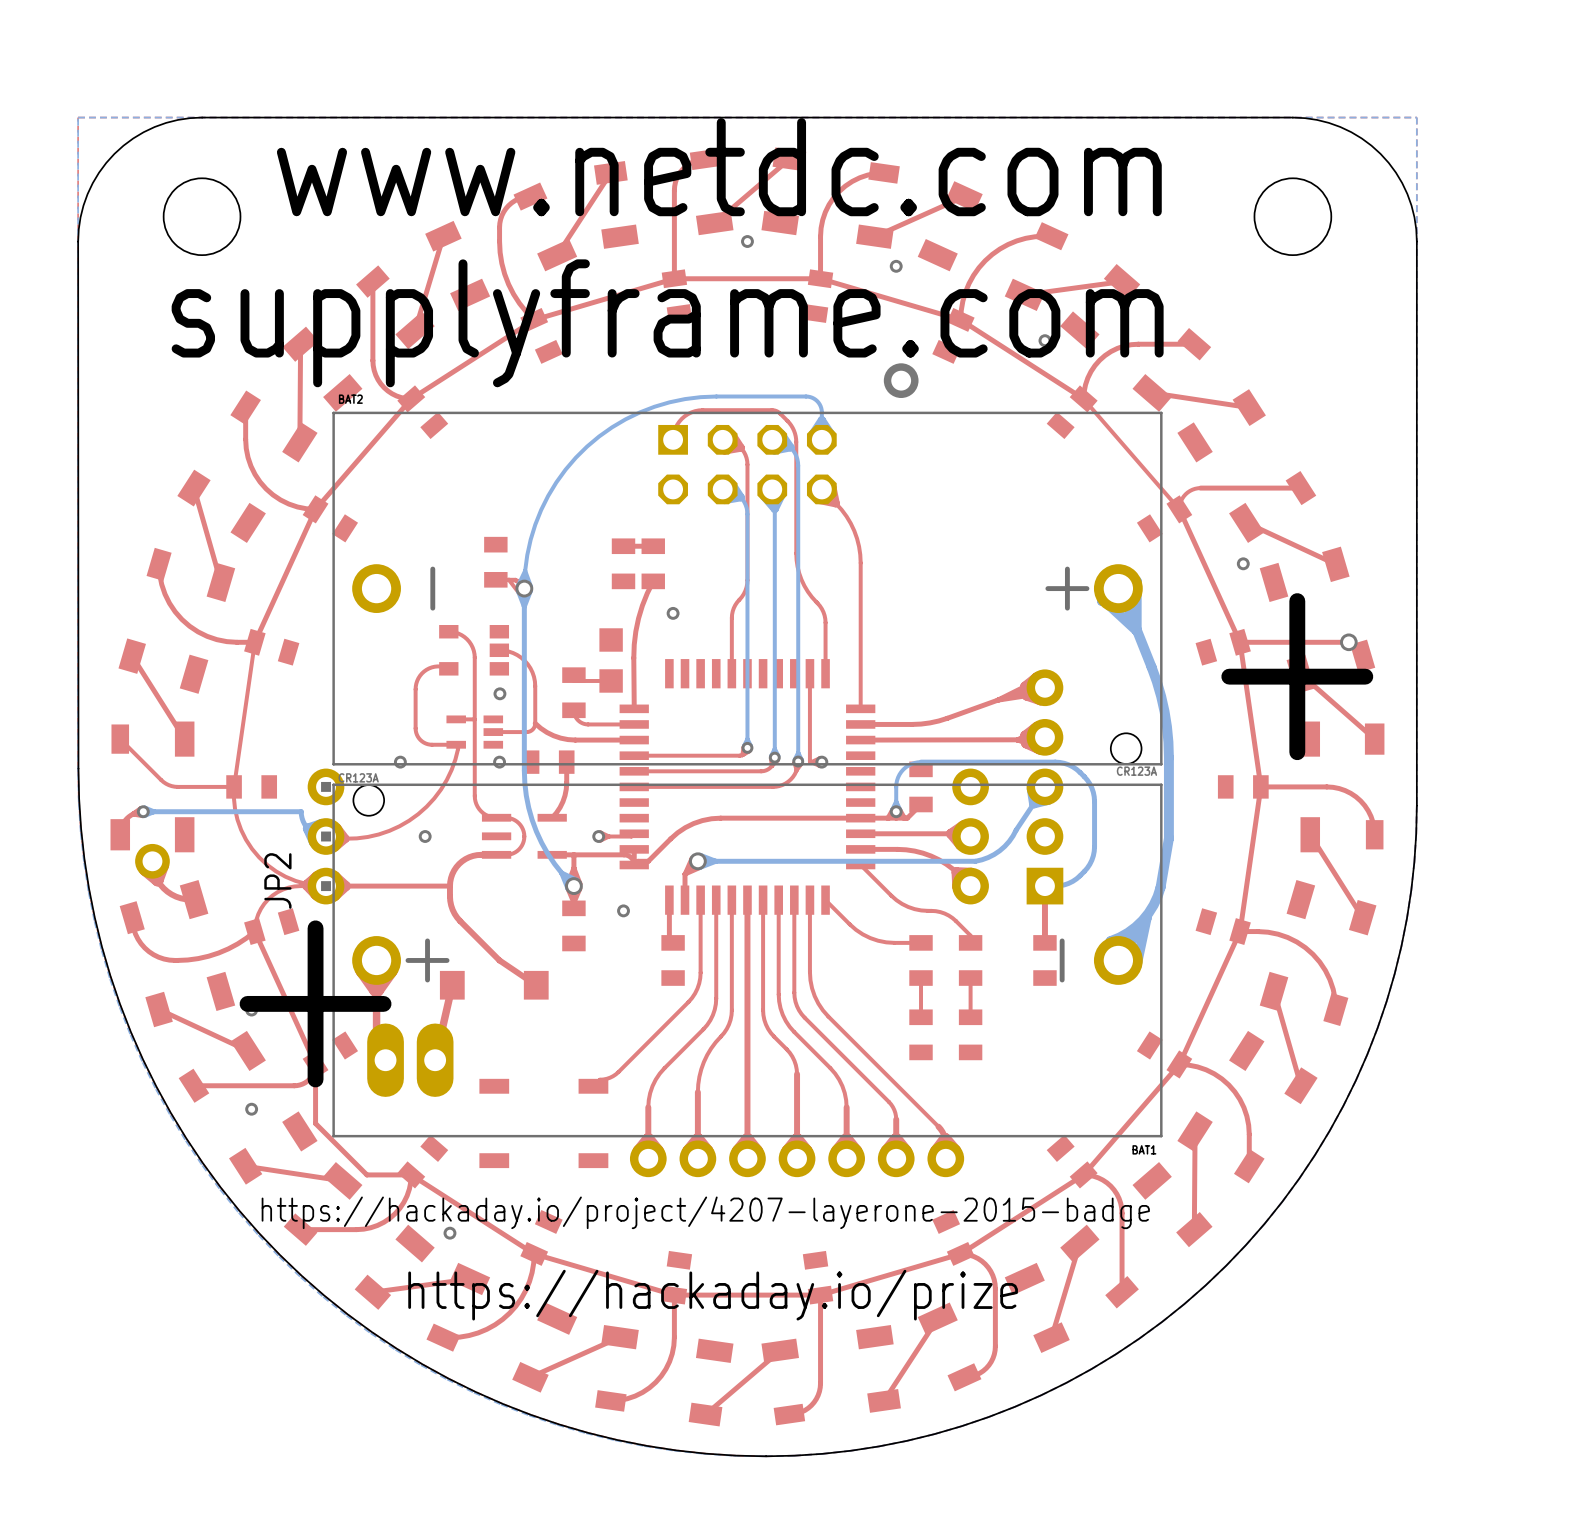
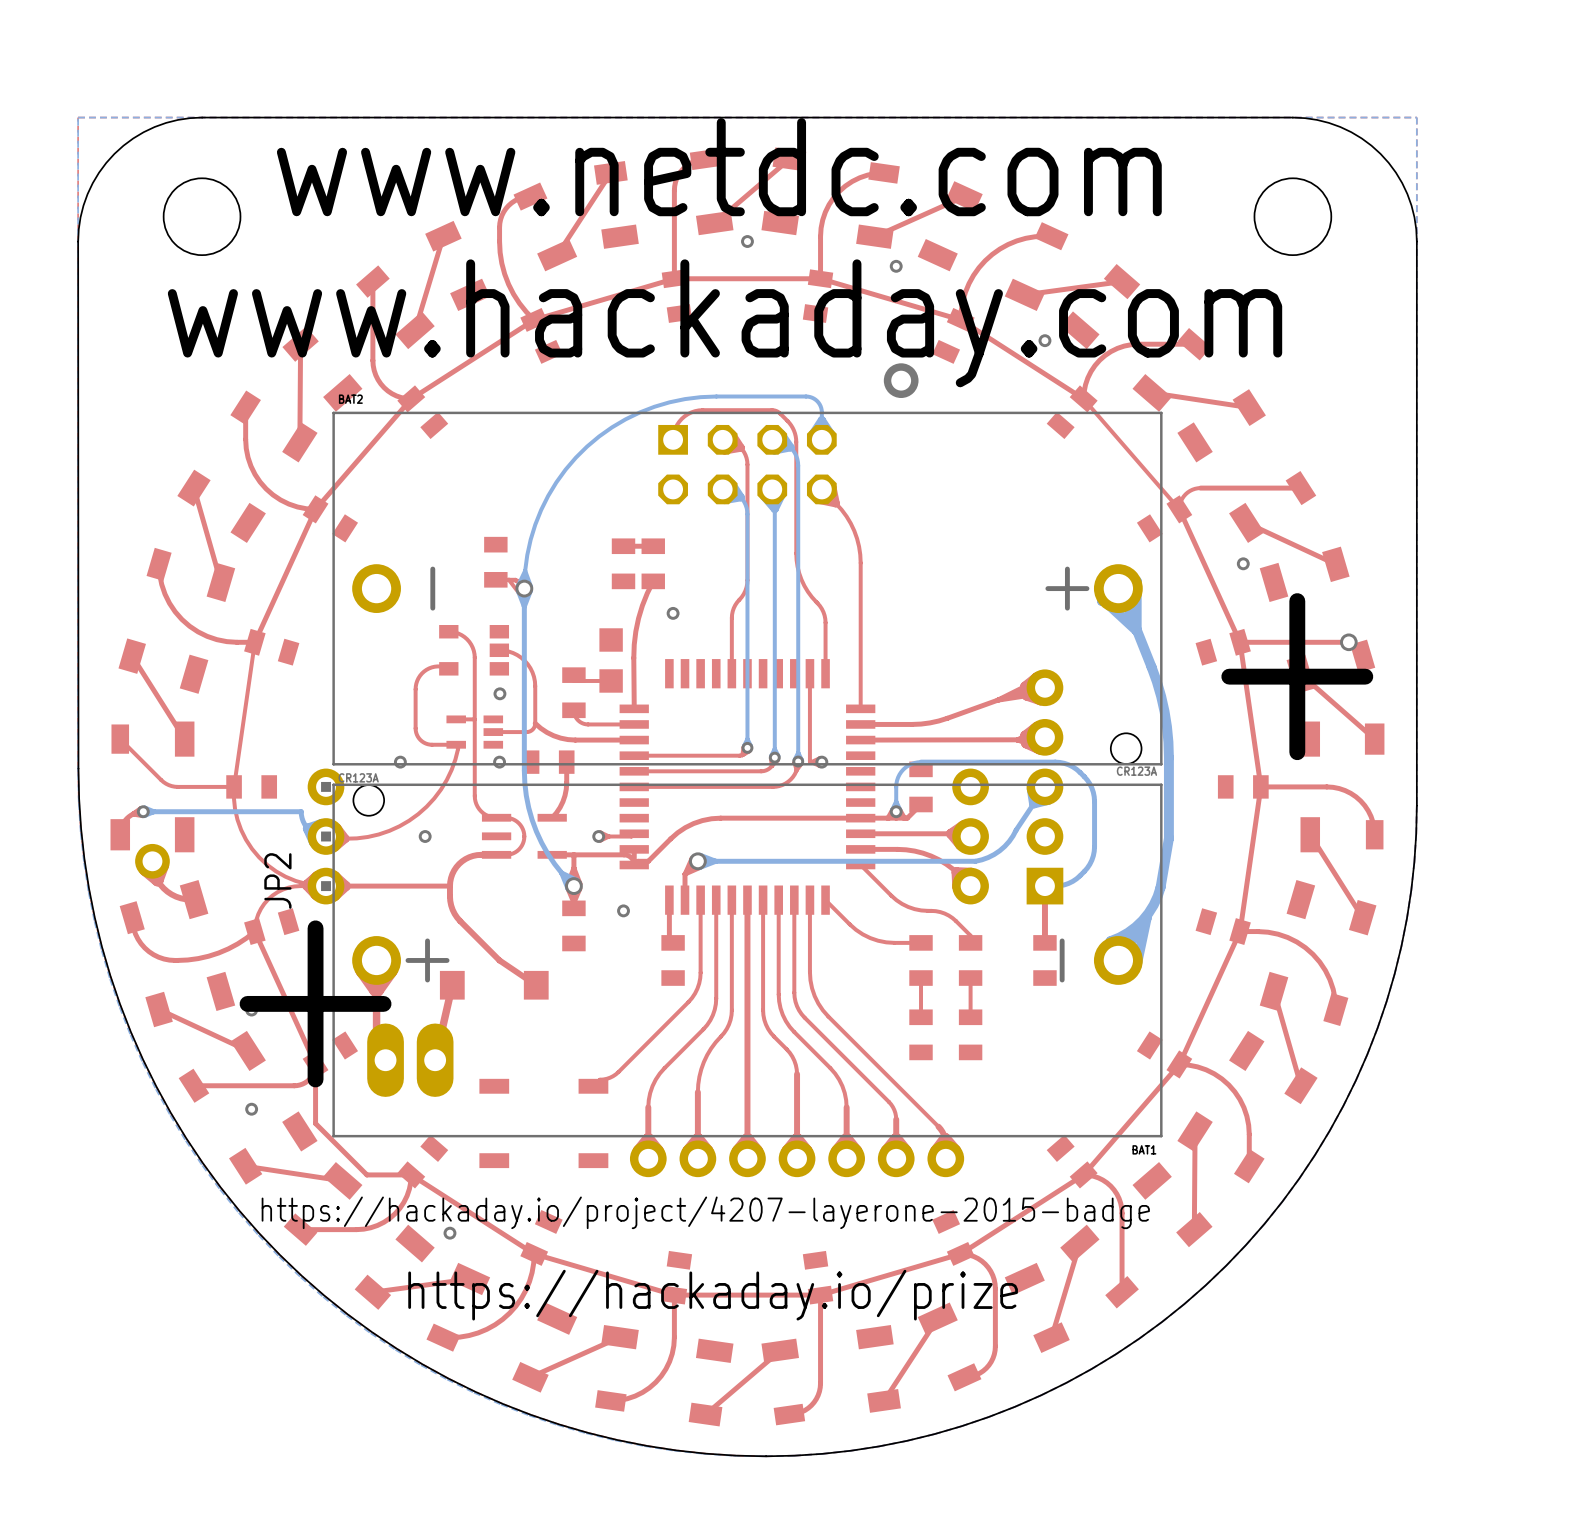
text: supplyframe.com (667, 323) -> www.hackaday.com (725, 323)

